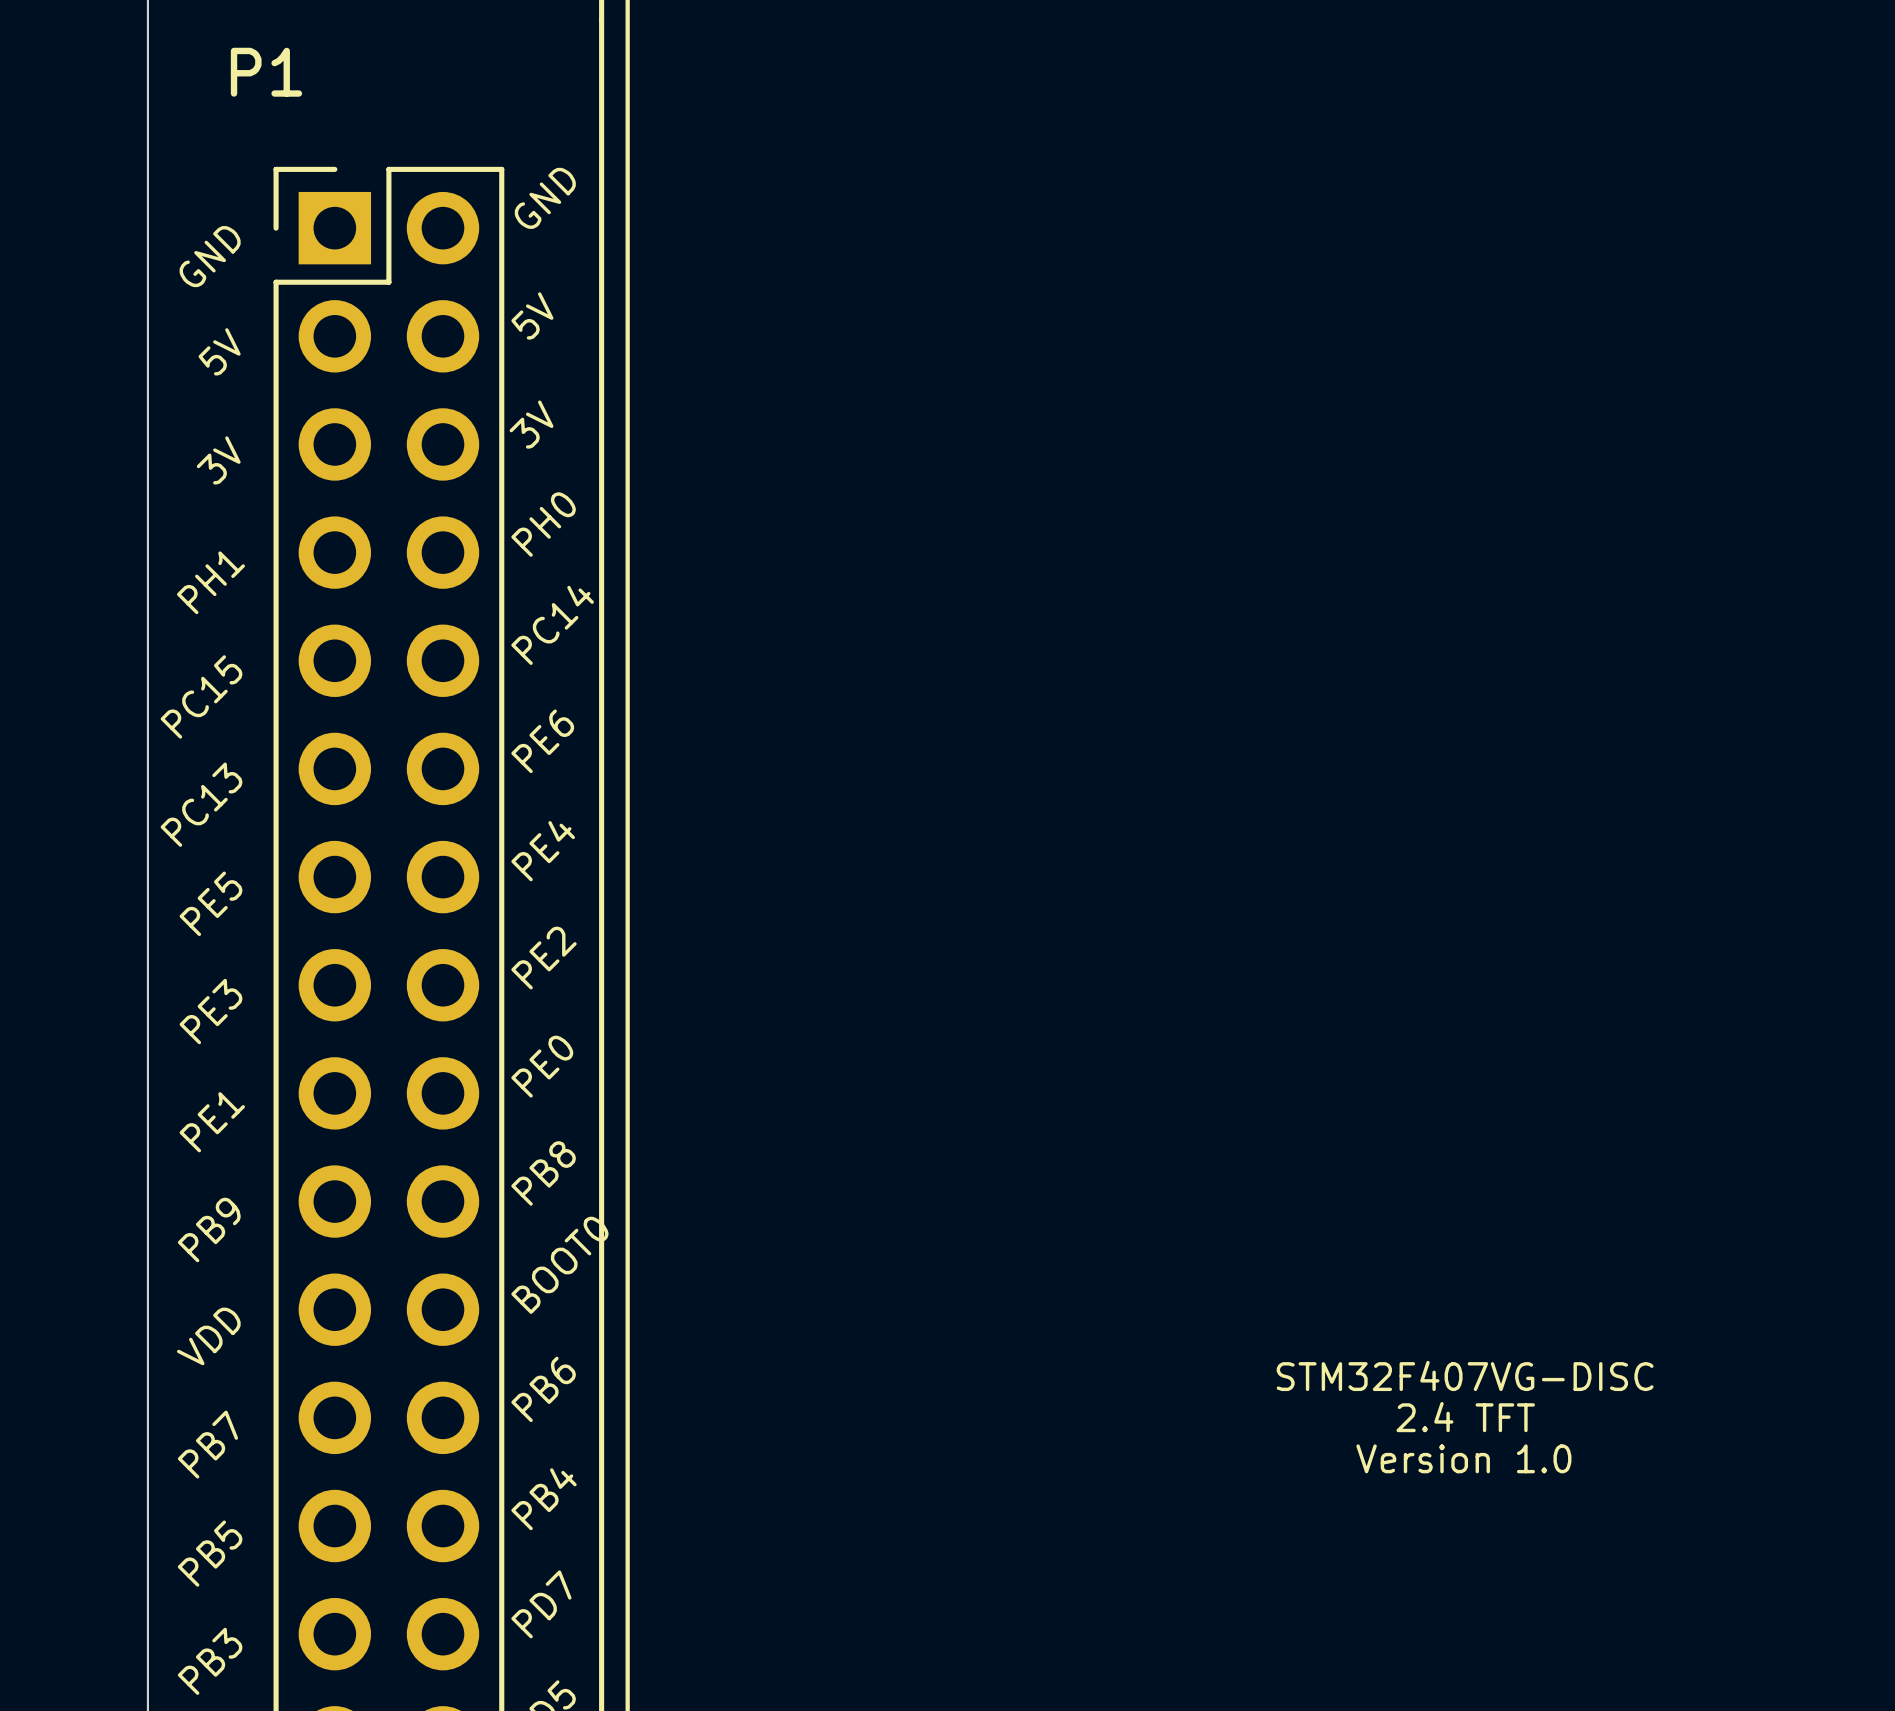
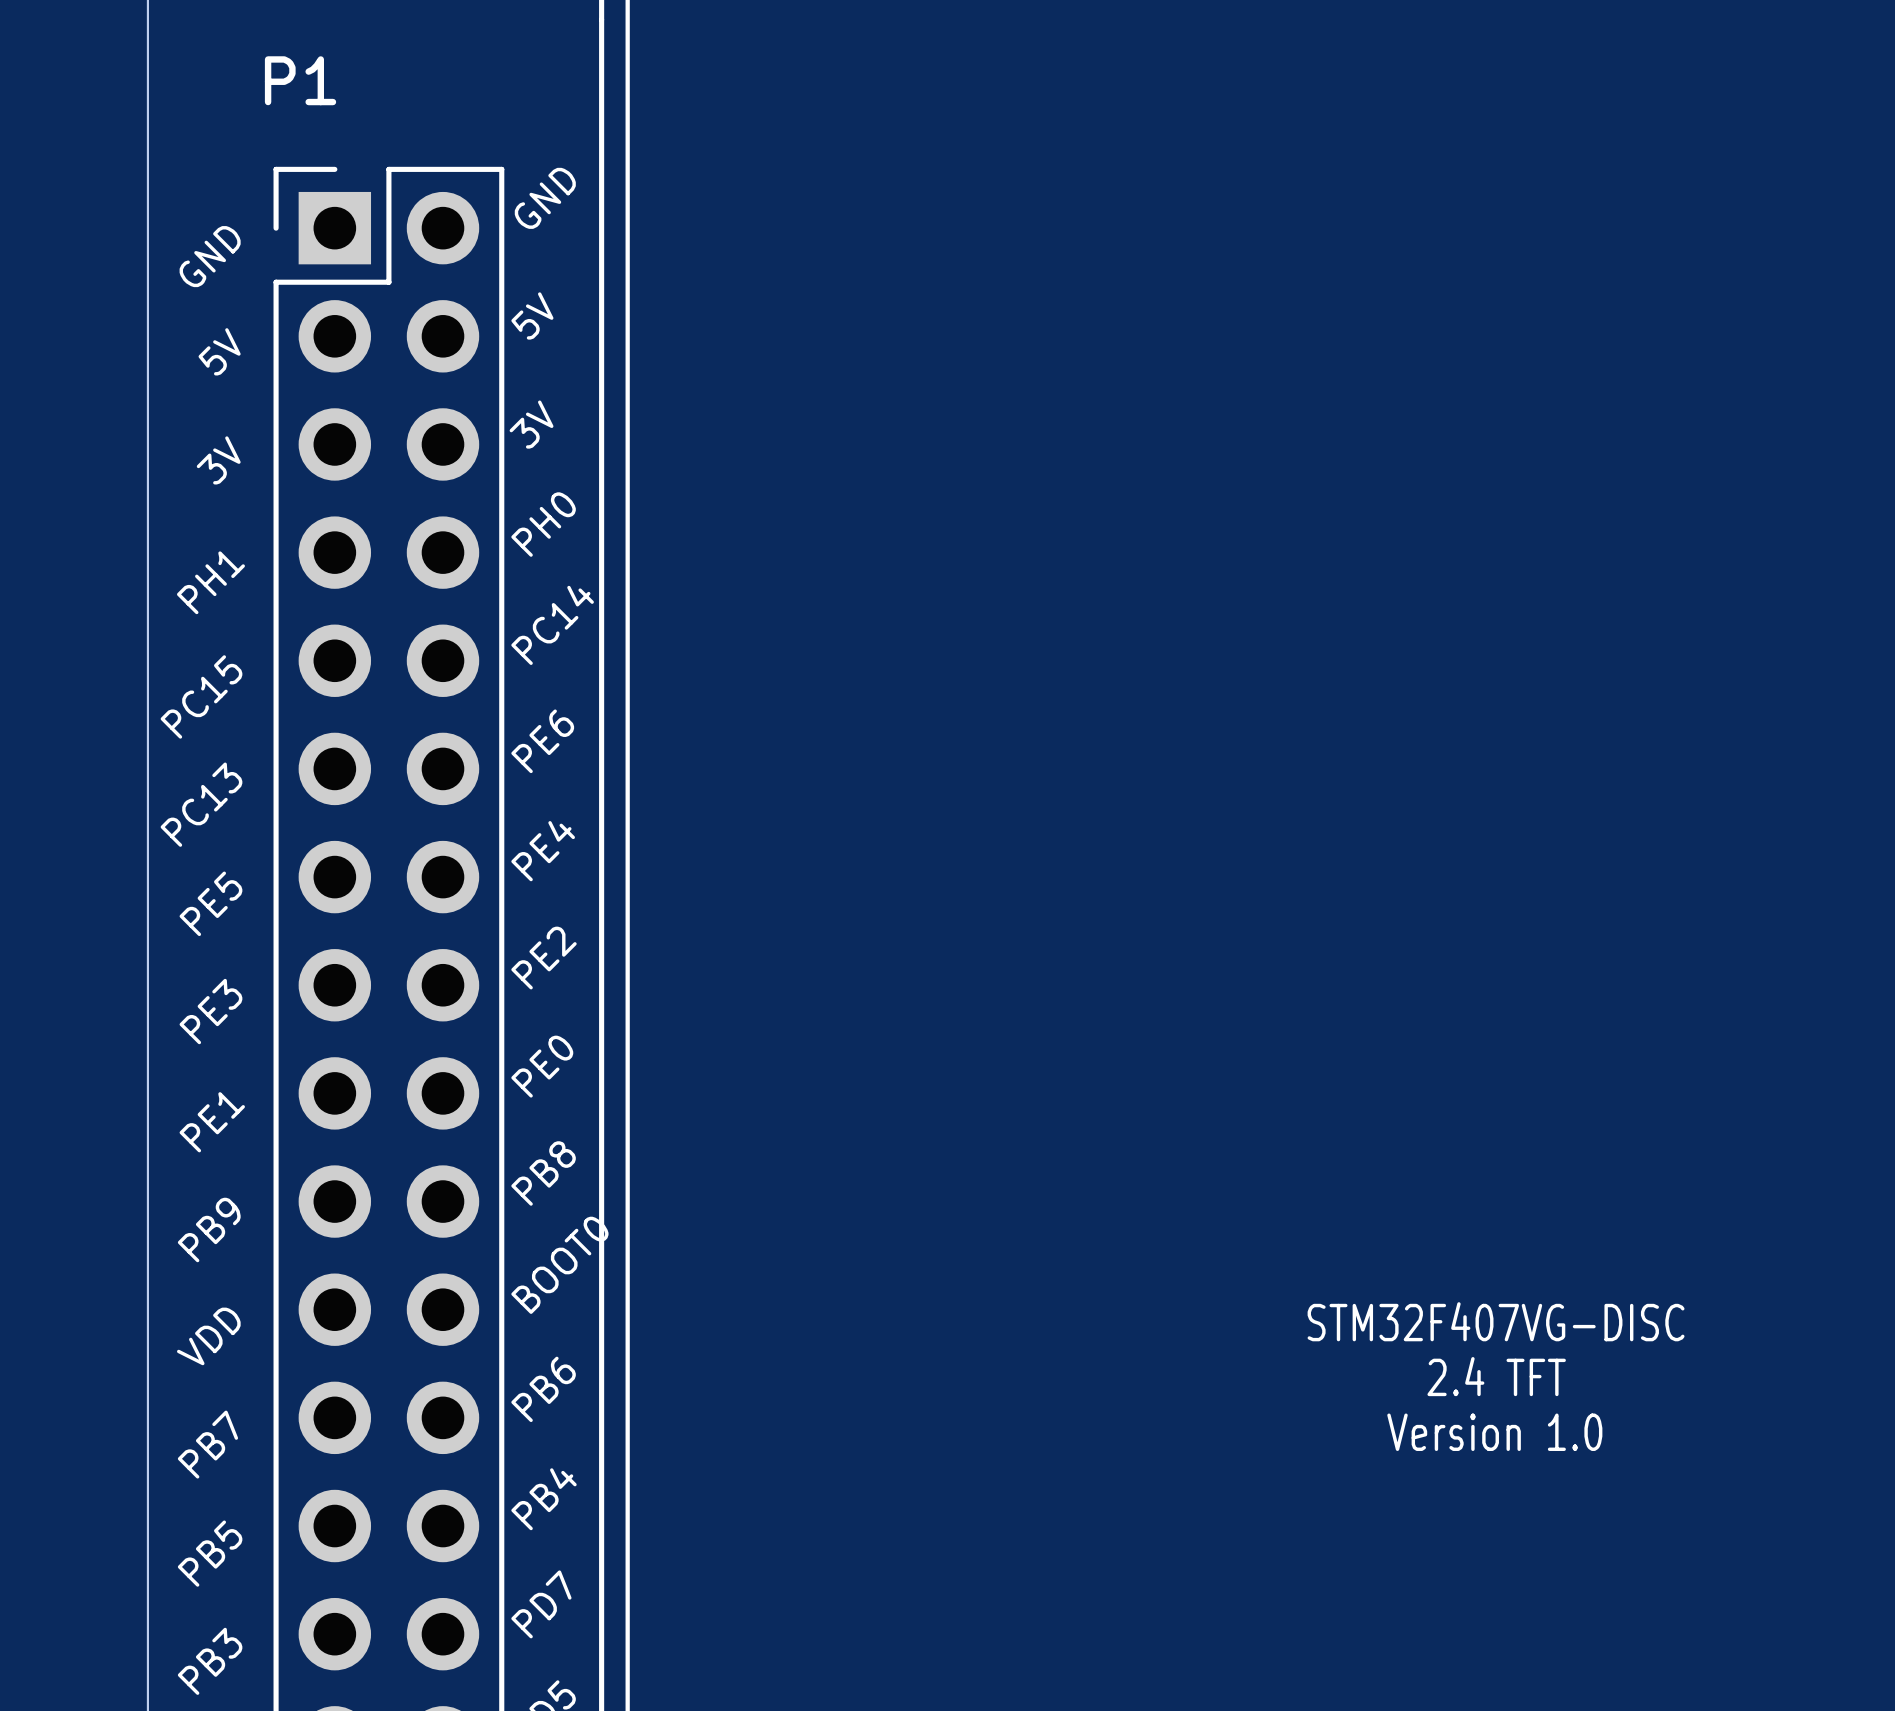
P1 name position: P1 (266, 72) -> P1 (300, 80)
text position: STM32F407VG-DISC (1465, 1375) -> STM32F407VG-DISC (1496, 1321)
text position: 2.4 TFT (1465, 1417) -> 2.4 TFT (1496, 1376)
text position: Version 1.0 (1463, 1458) -> Version 1.0 (1494, 1432)

